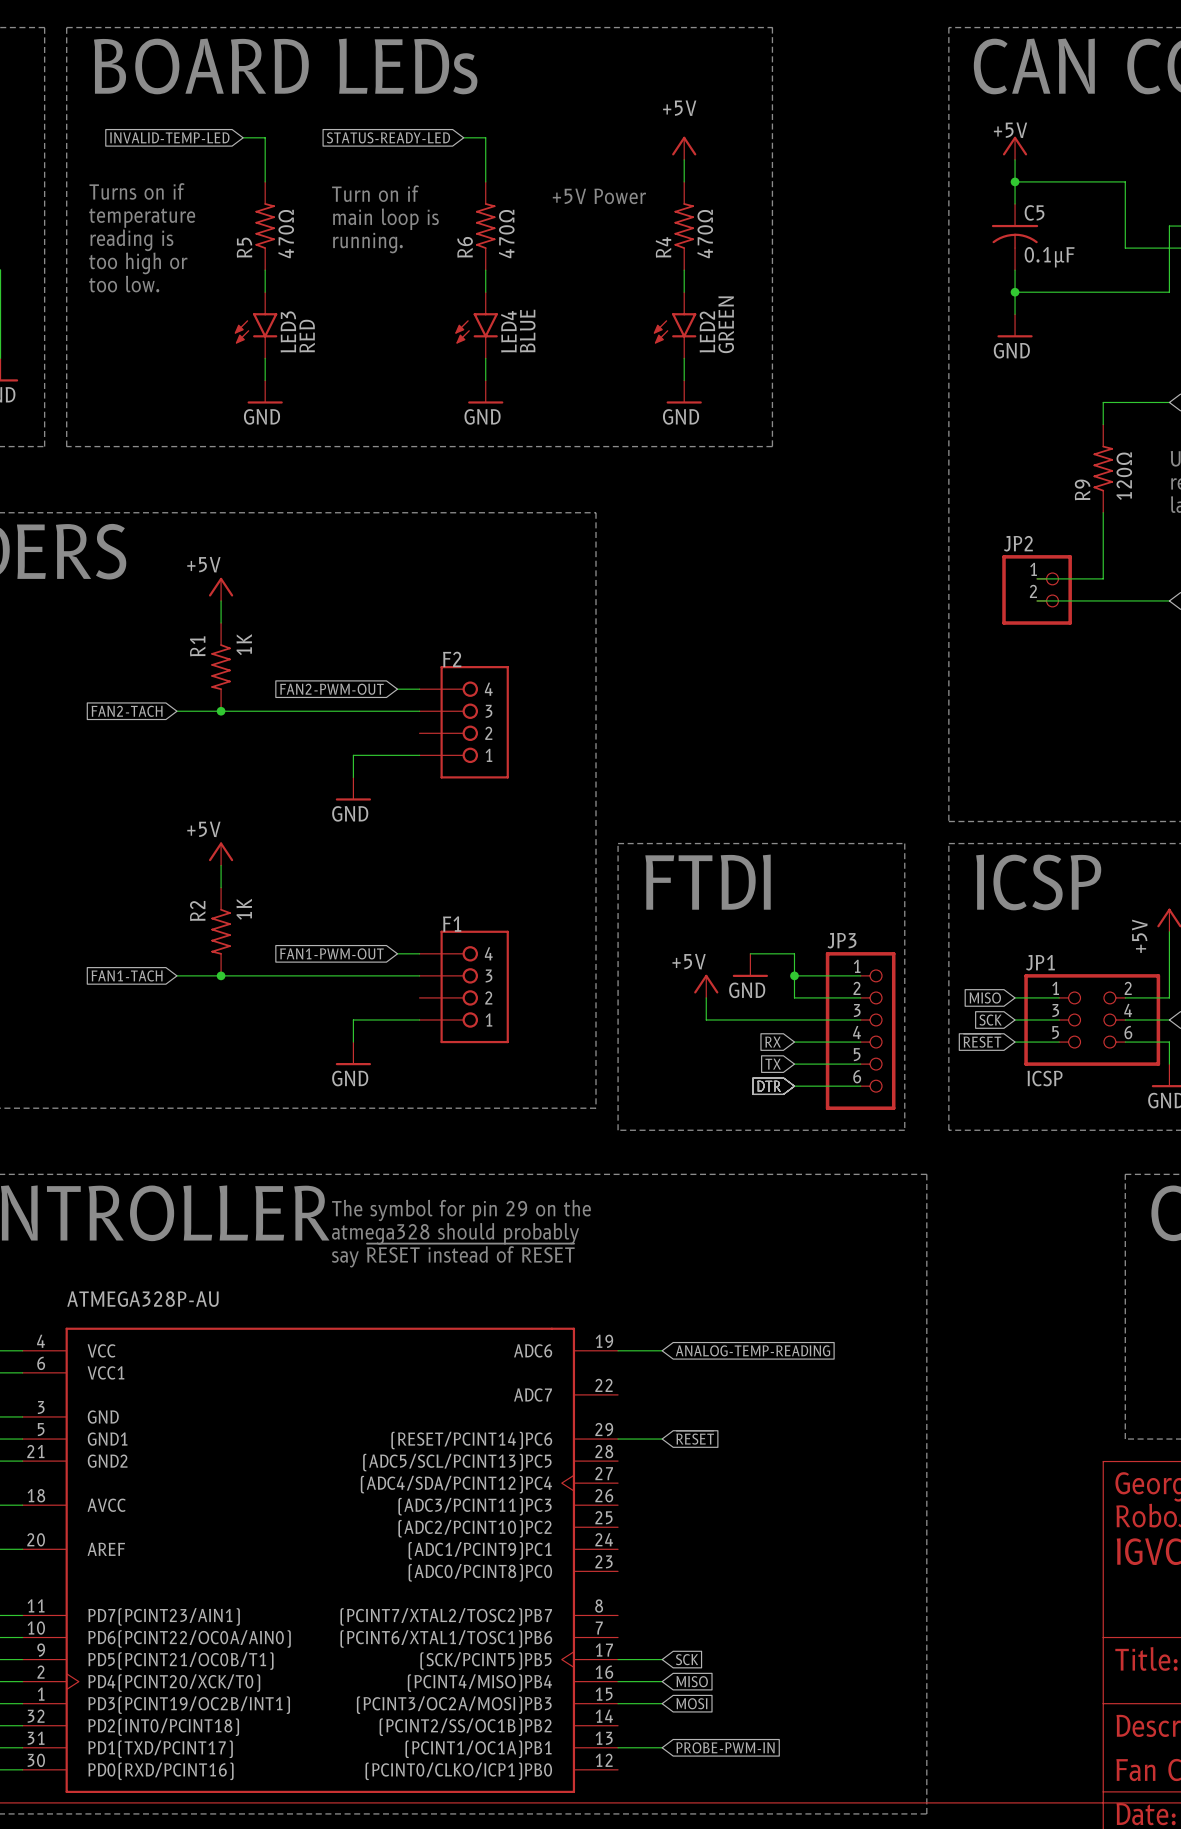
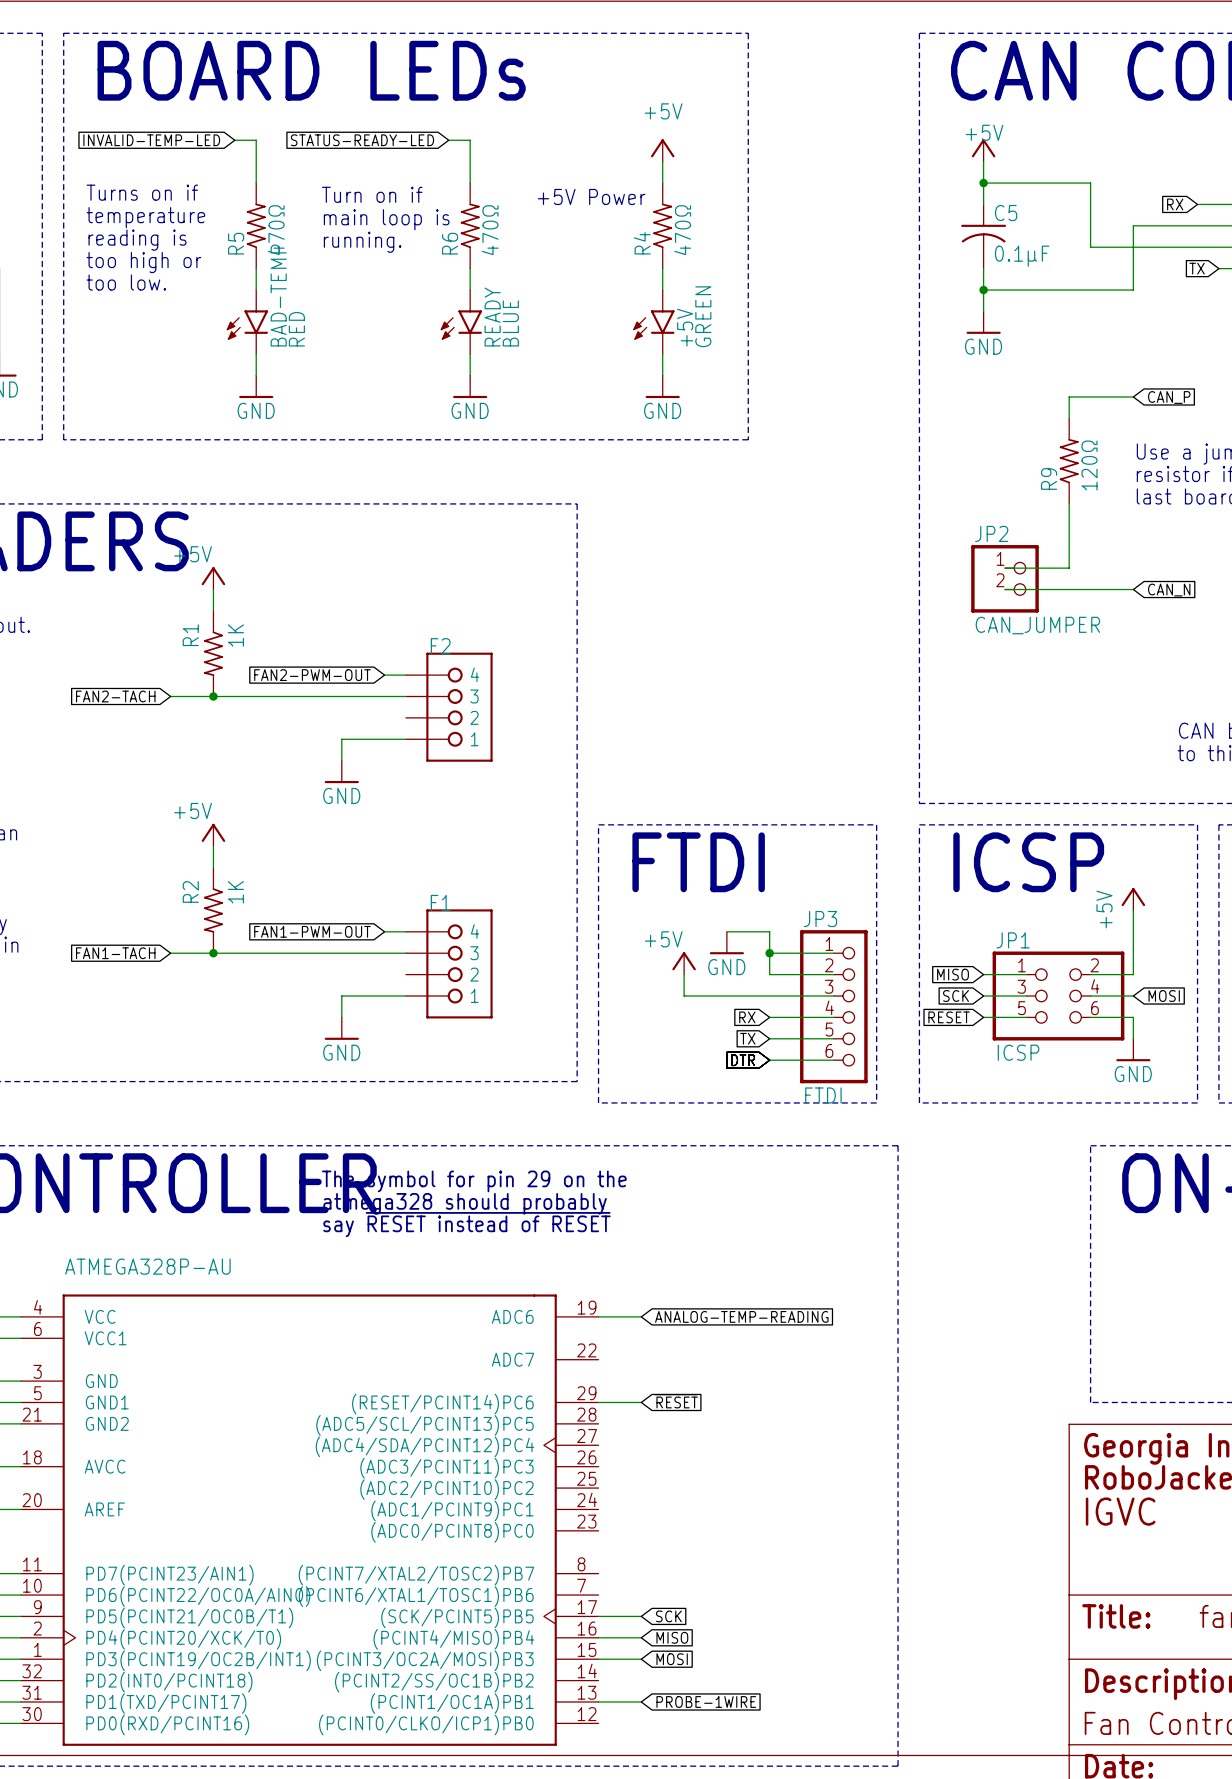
LED3 name: LED3 (288, 331) -> BAD-TEMP (278, 295)
LED4 name: LED4 (508, 331) -> READY (492, 317)
LED2 name: LED2 (707, 331) -> +5V (685, 327)
JP2 value: none -> CAN_JUMPER (1037, 625)
JP3 value: none -> FTDI (823, 1095)
global label: PROBE-PWM-IN (725, 1747) -> PROBE-1WIRE (706, 1701)

